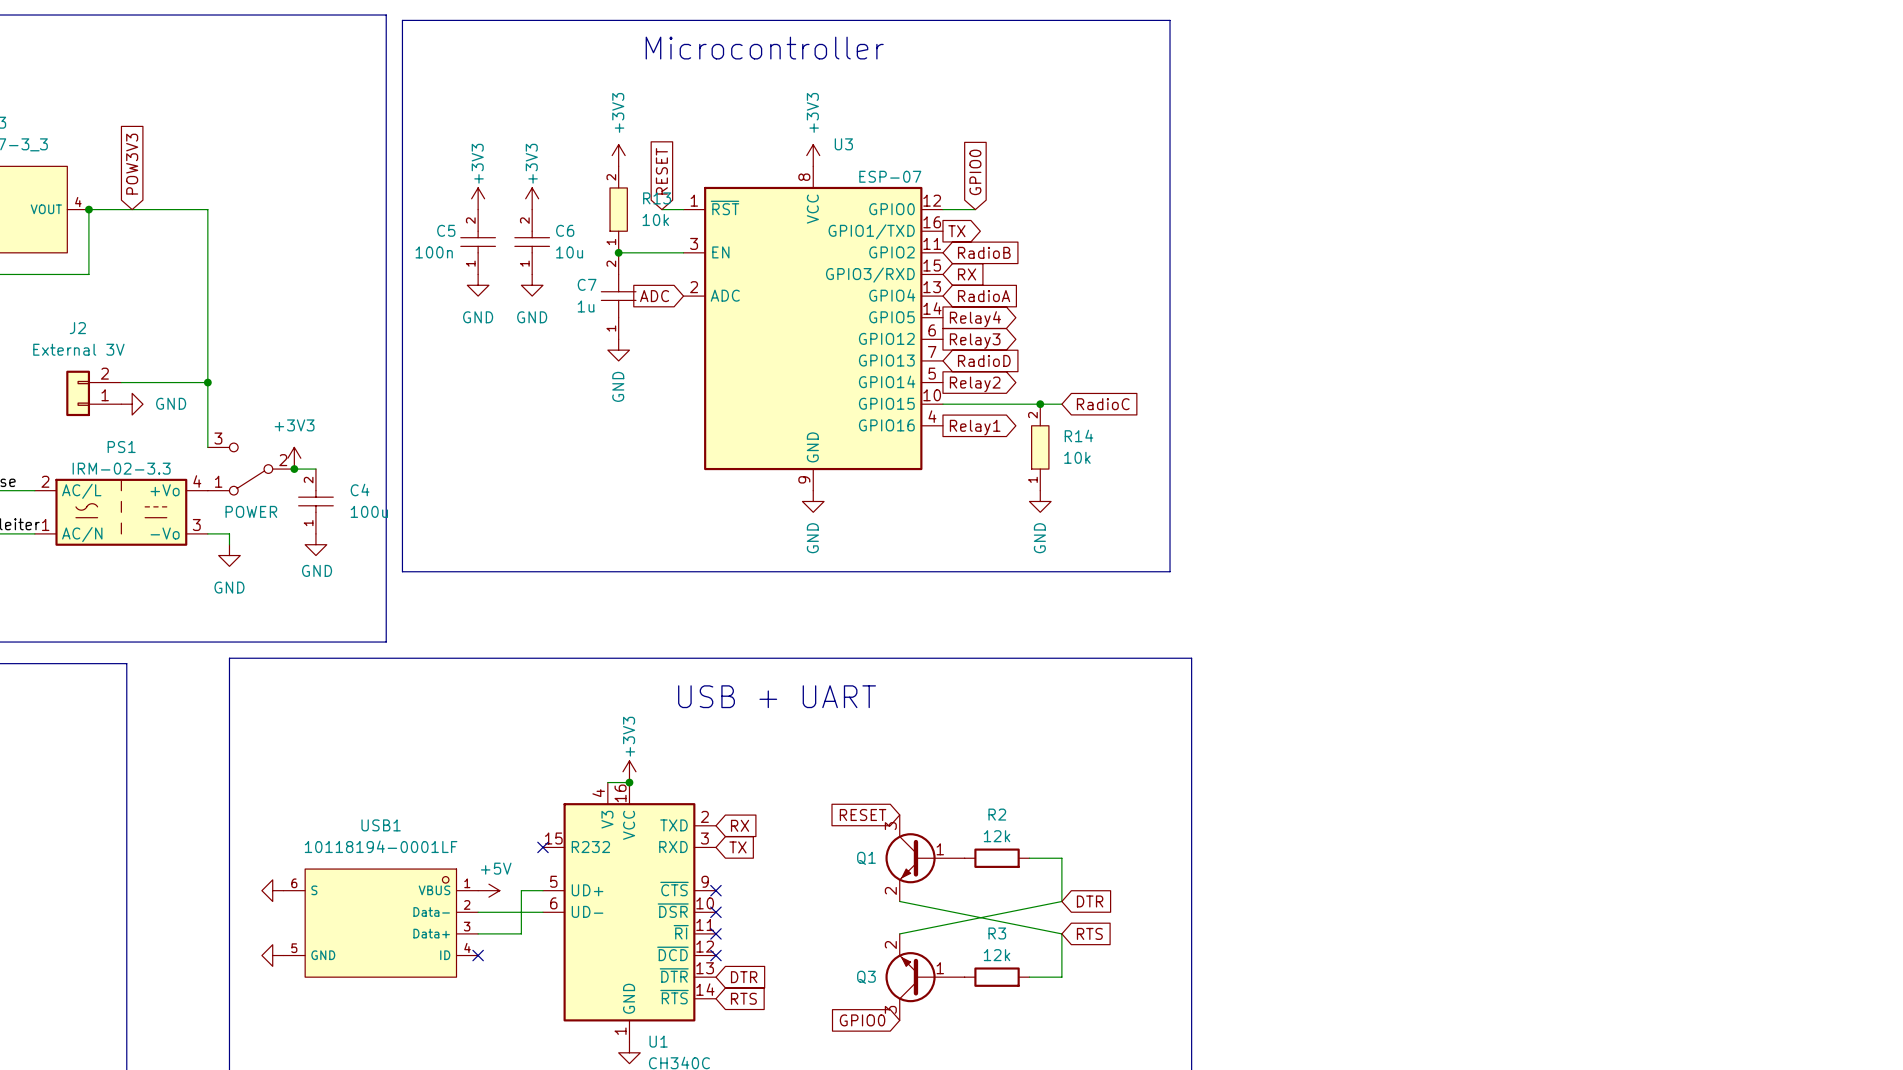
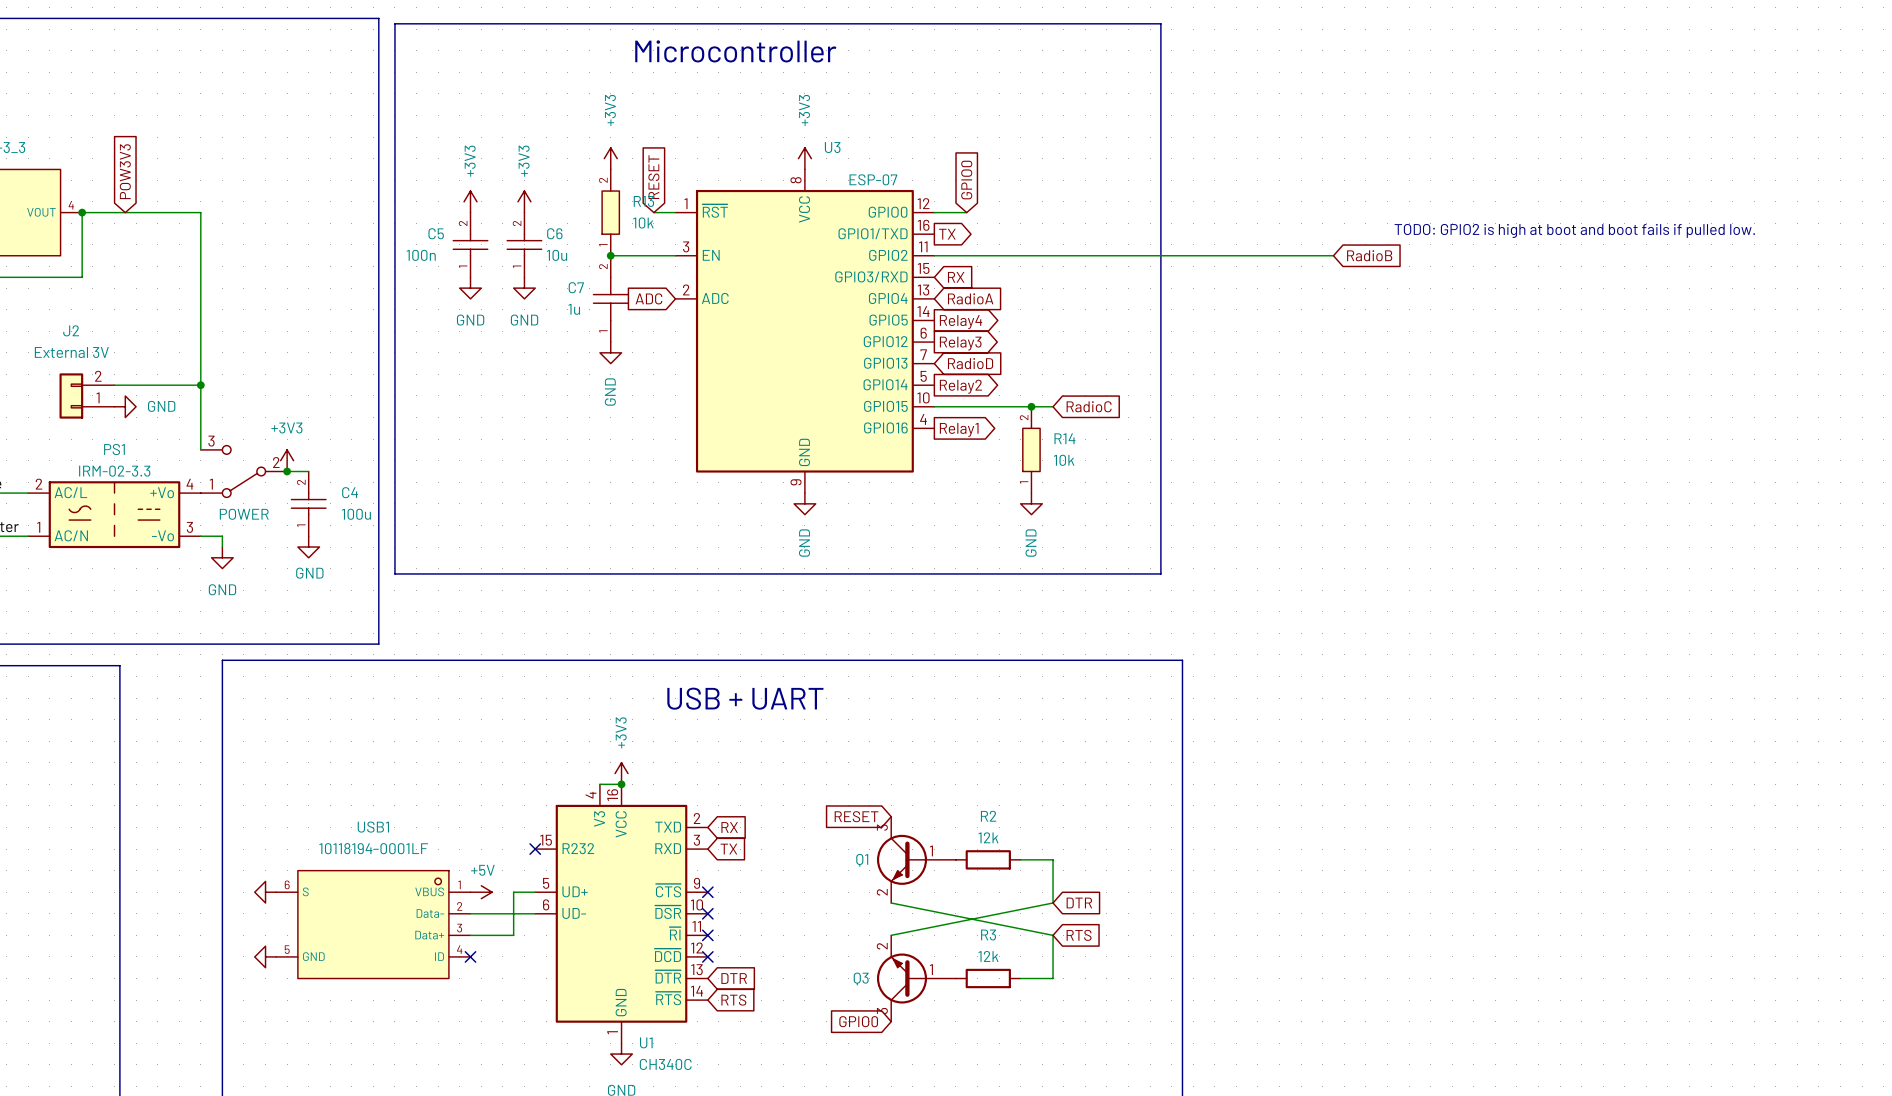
text: none -> TODO: GPIO2 is high at boot and boot fails if pulled low. (1574, 230)
wire: none -> (934, 255) (1333, 255)
global label: RadioB (984, 252) -> none
global label: none -> RadioB (1369, 255)

